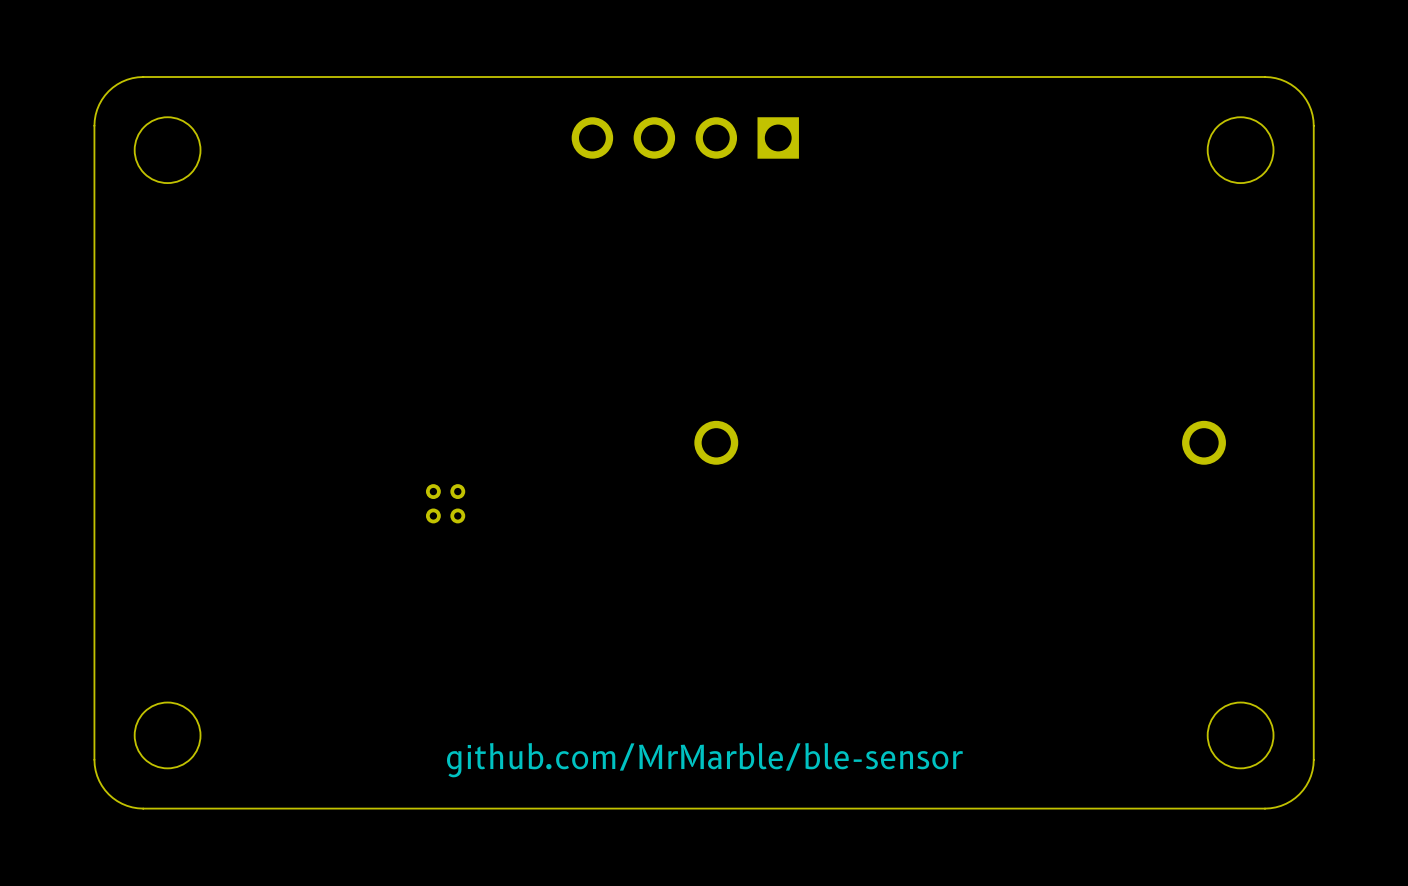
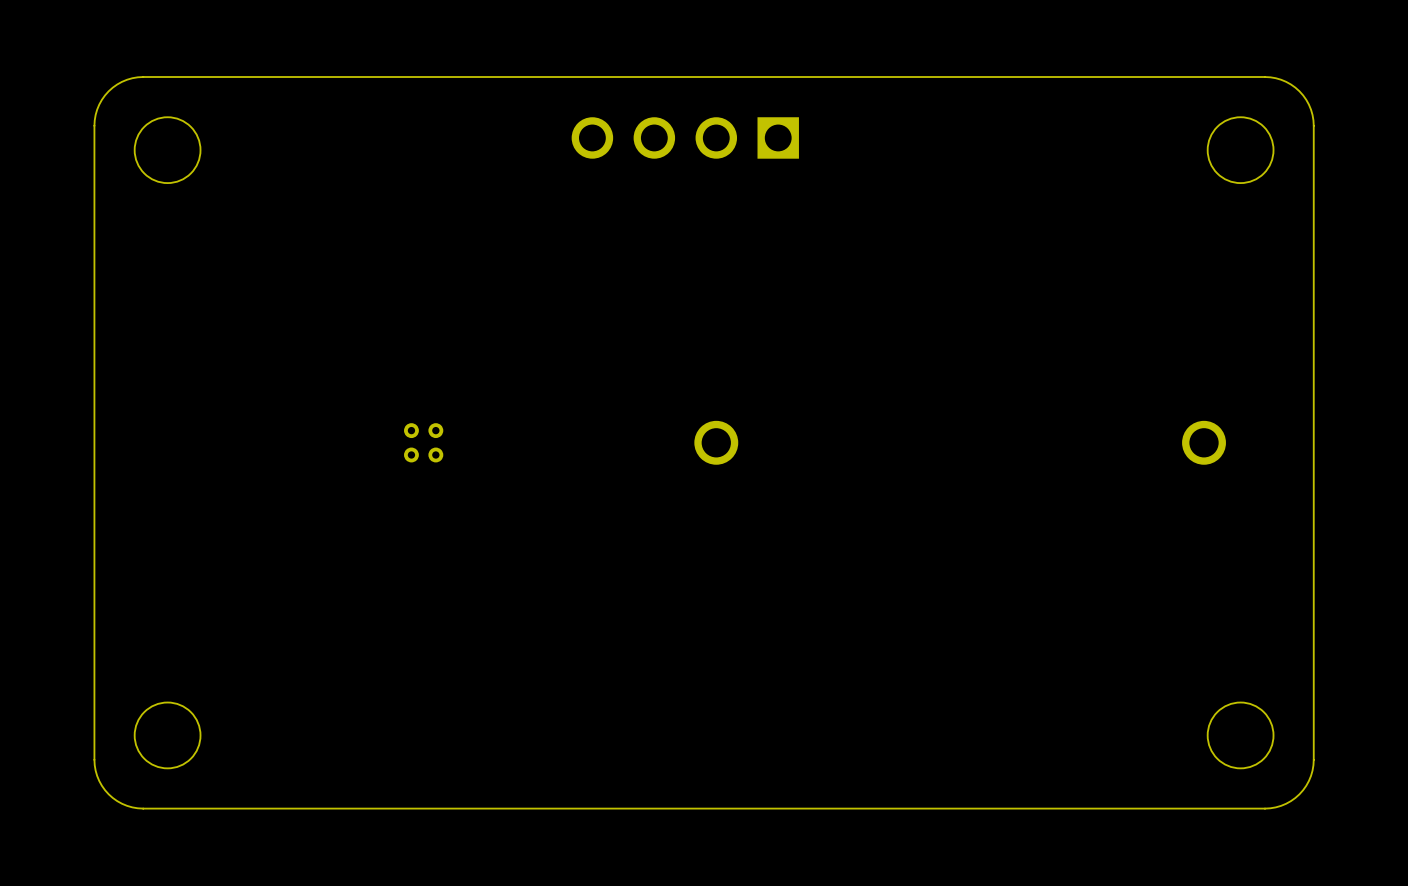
part position: (445, 503) -> (423, 442)
text: github.com/MrMarble/ble-sensor (704, 760) -> none

